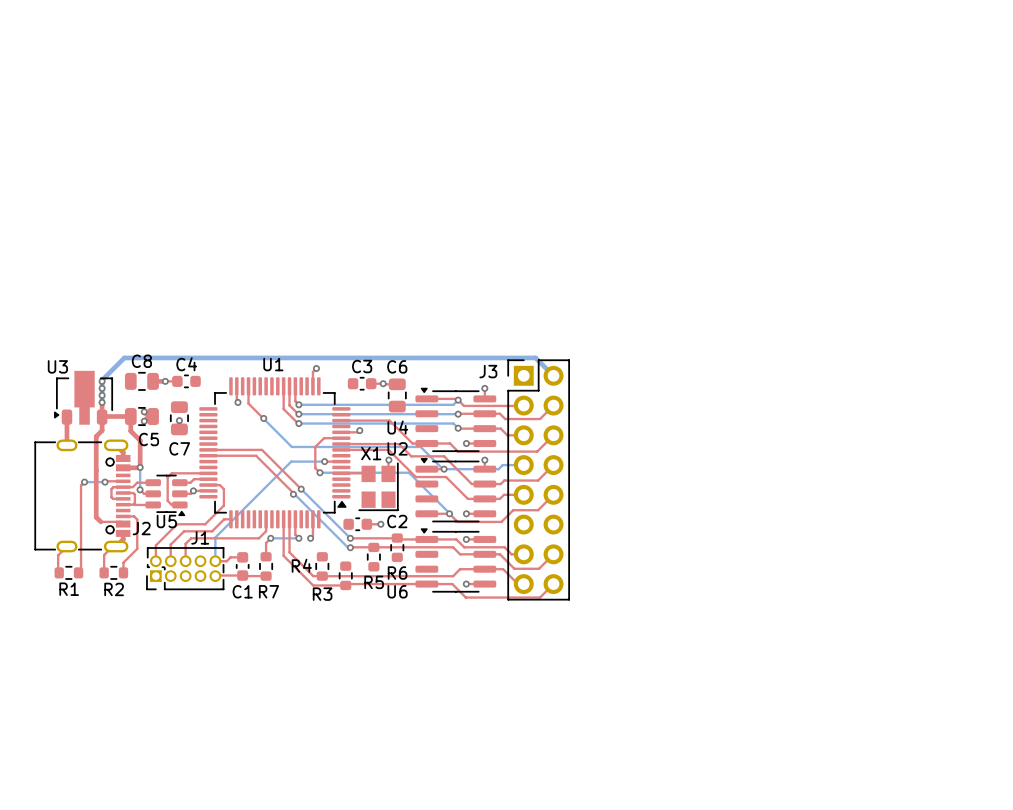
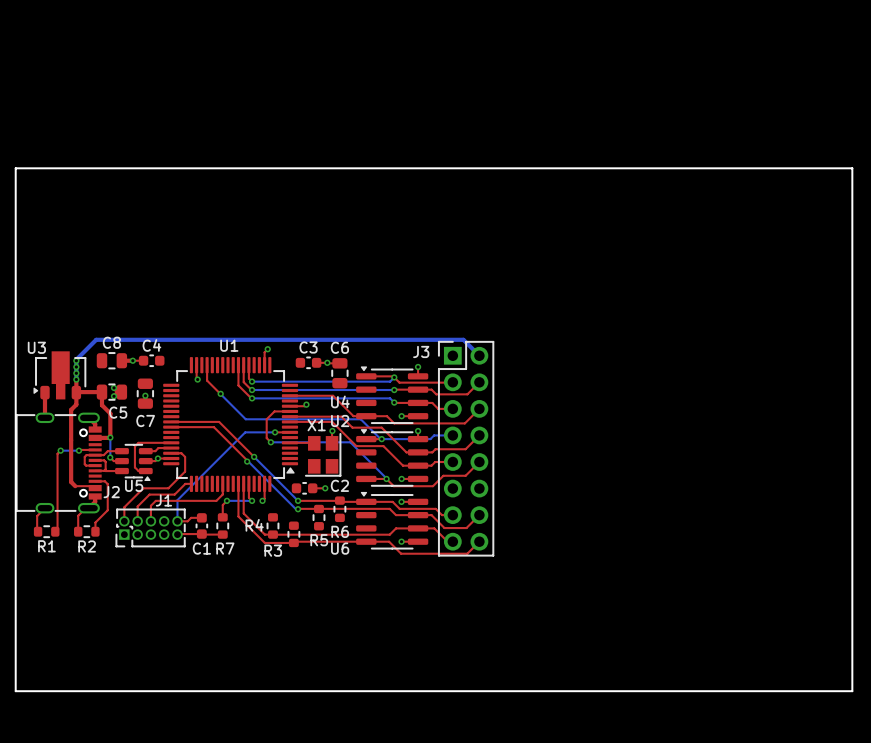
board edge: none -> (15, 168) (852, 168) (852, 691) (15, 691) (15, 168)

